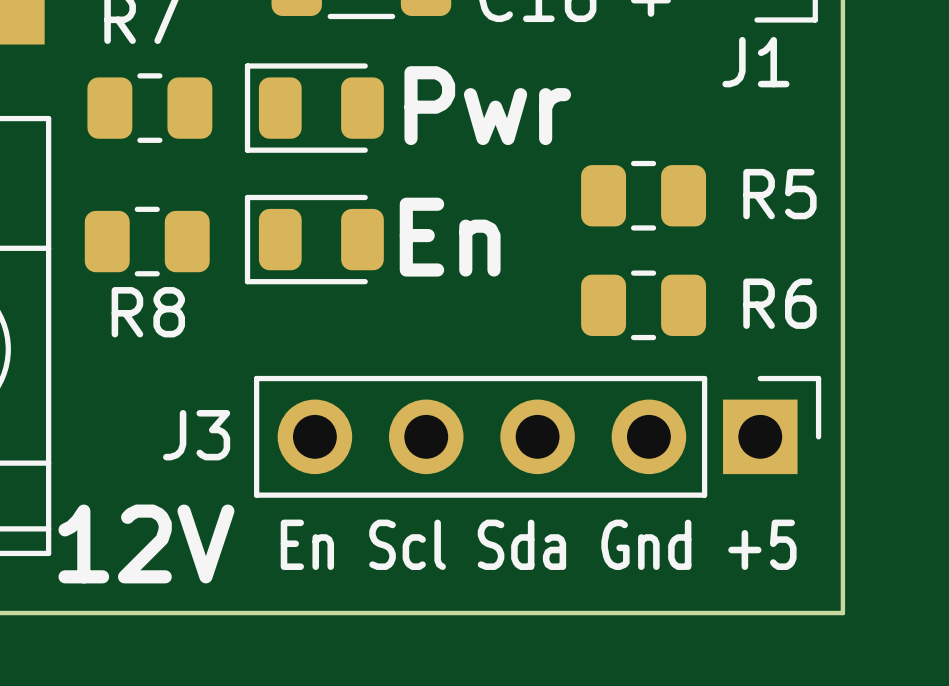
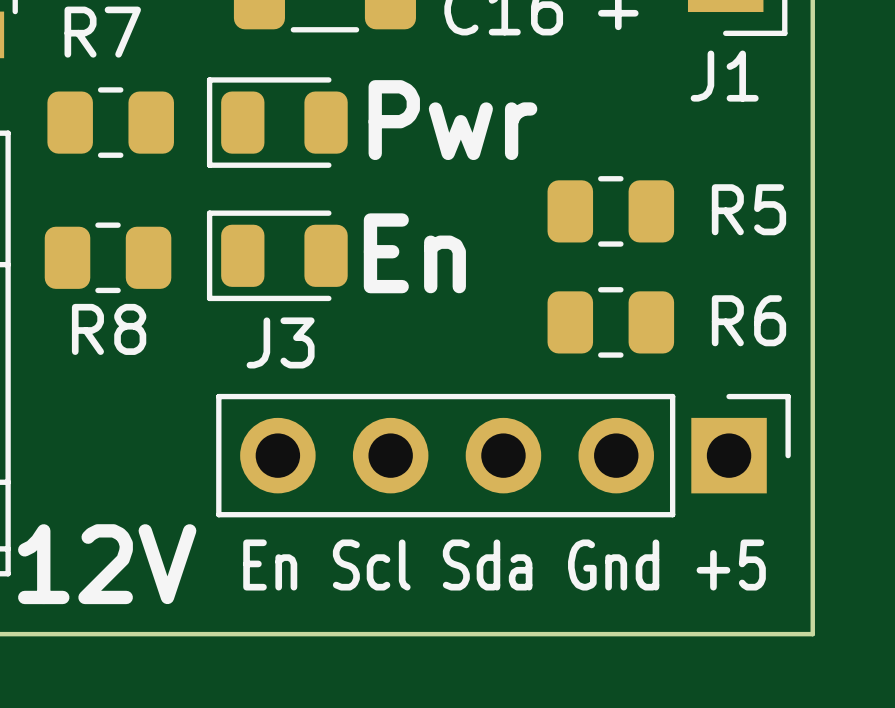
J3 name position: J3 (196, 435) -> J3 (280, 342)

